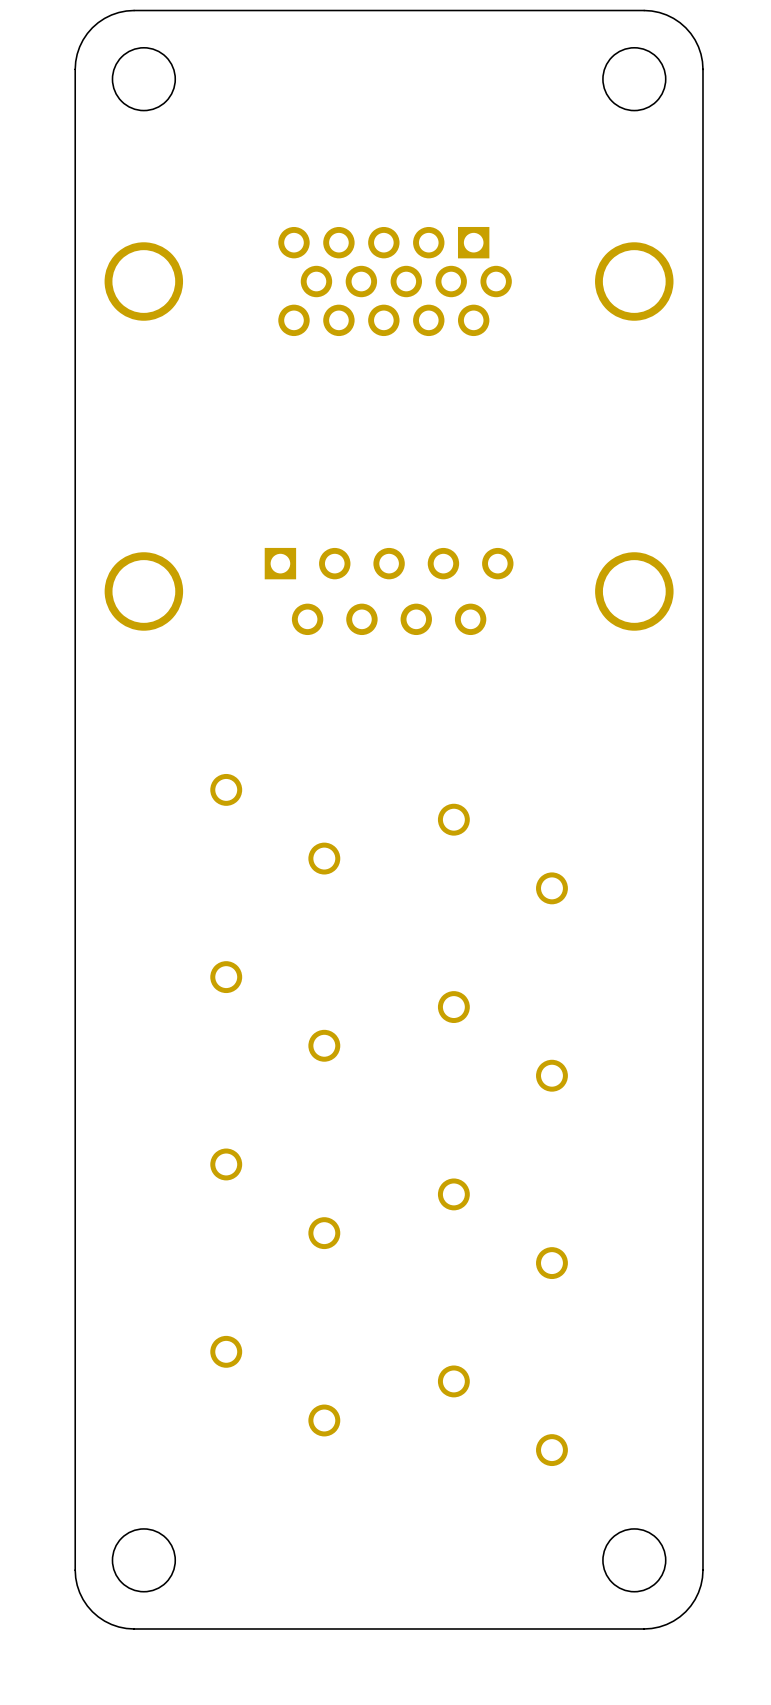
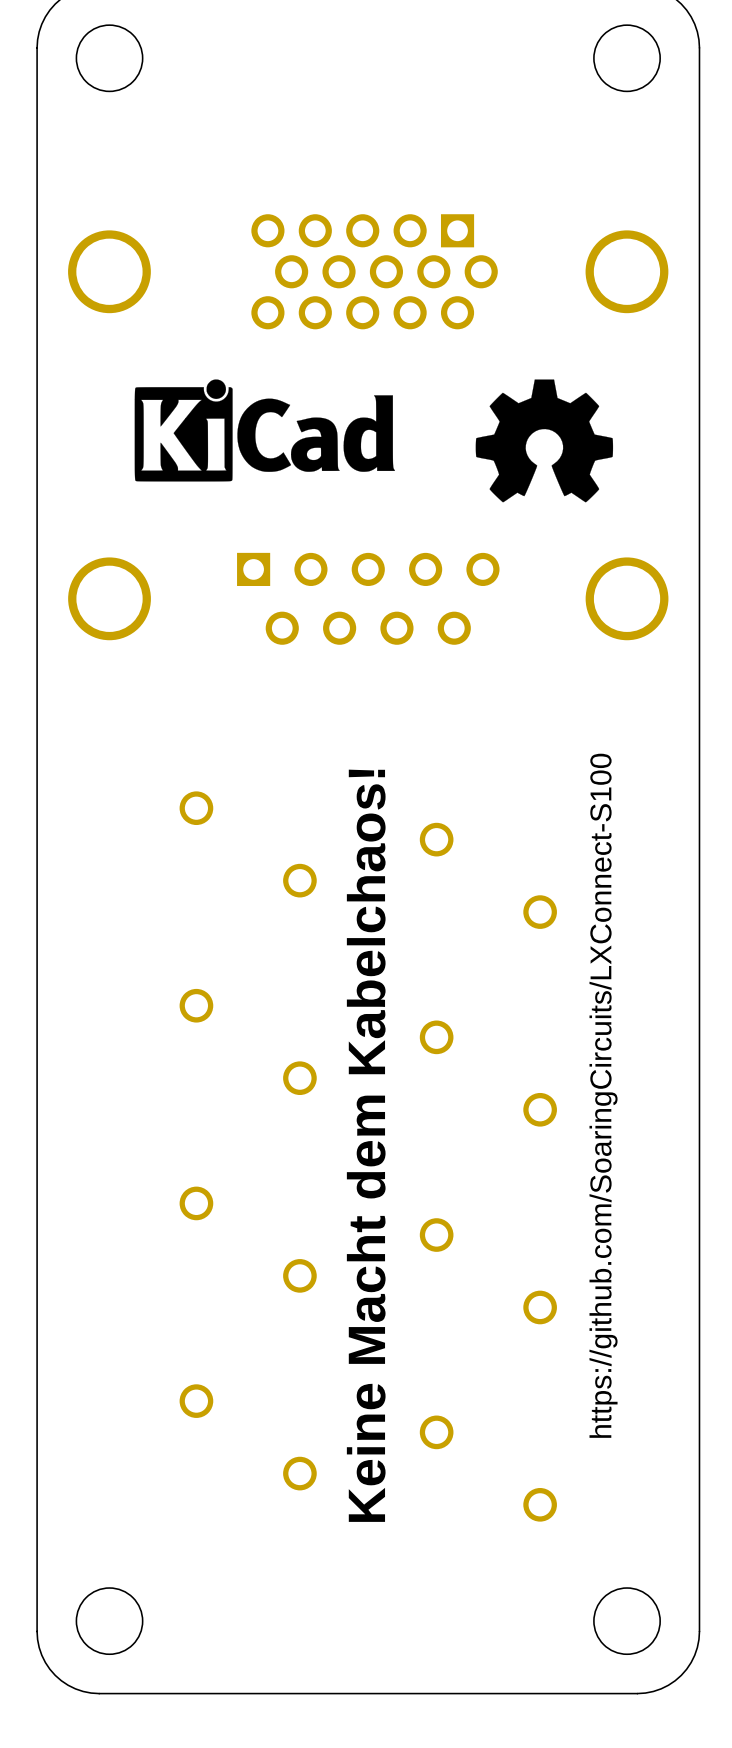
drawing: none -> [134, 379, 396, 482]
drawing: none -> [475, 379, 614, 503]
text: none -> https://github.com/SoaringCircuits/LXConnect-S100 (603, 1095)
text: none -> Keine Macht dem Kabelchaos! (366, 1145)

